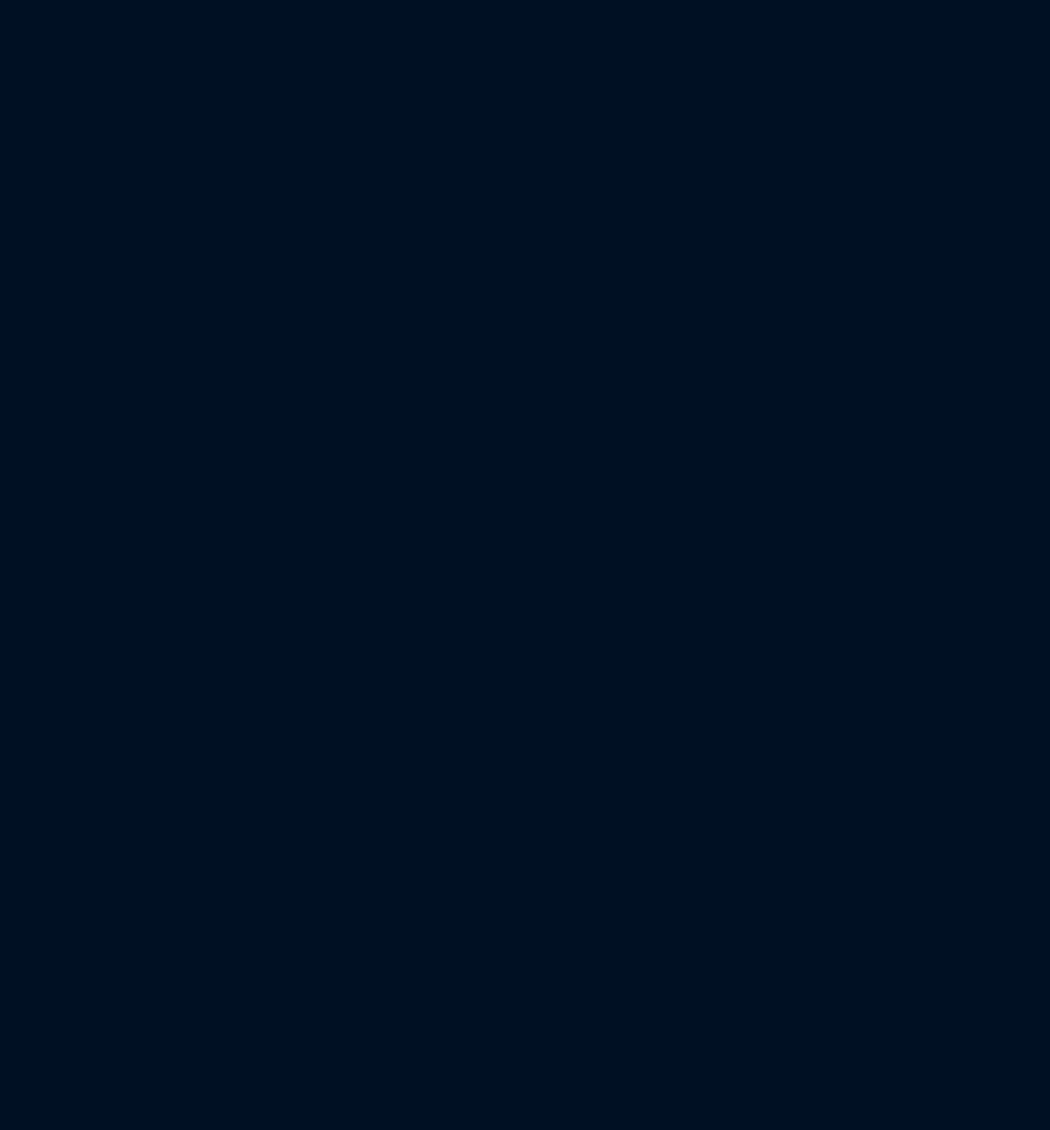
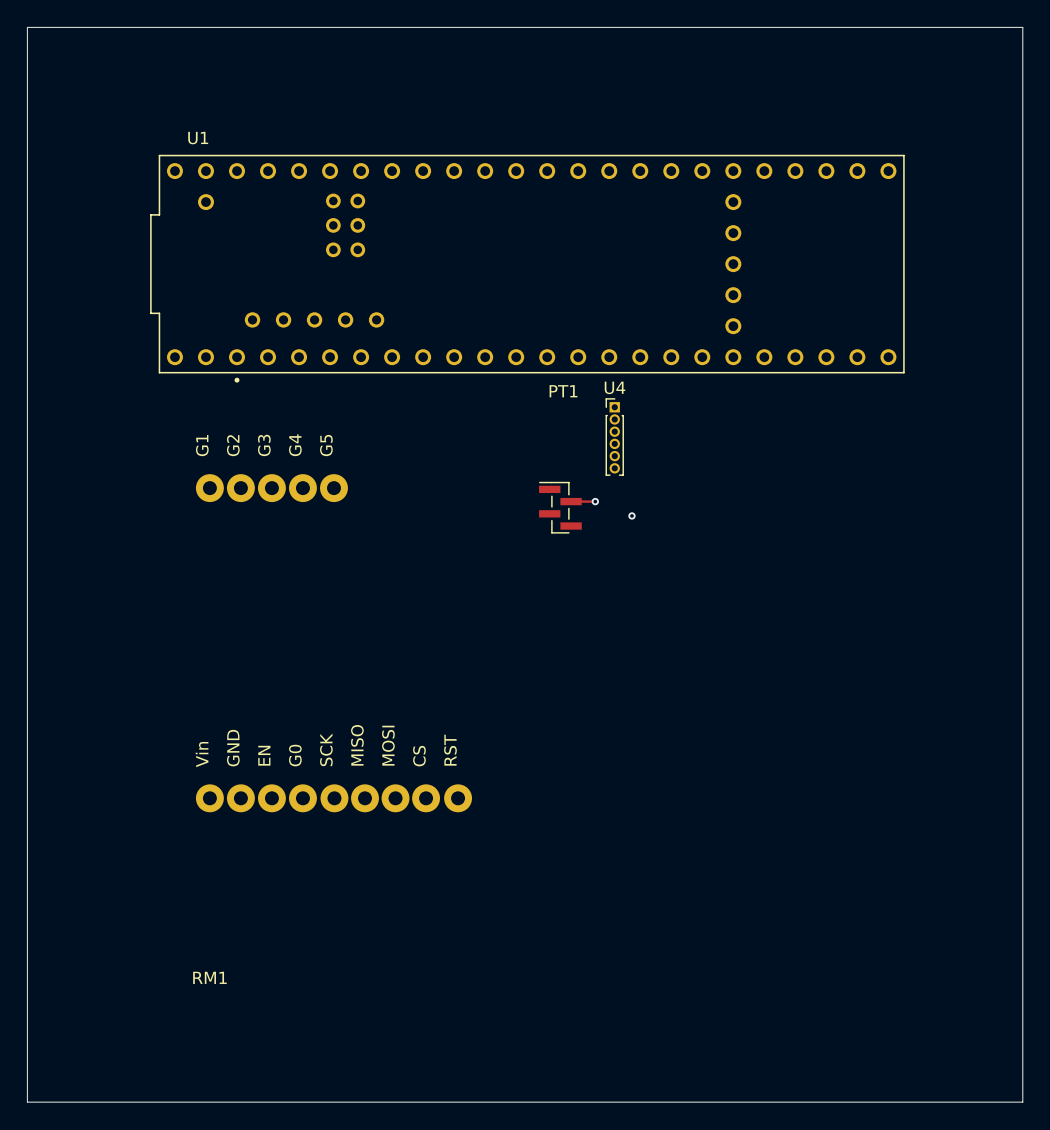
board edge: none -> (27, 27) (1022, 27) (1022, 1102) (27, 1102) (27, 27)
U1: none -> (527, 268)
U4: none -> (614, 437)
track: none -> (571, 501) (595, 501)
via: none -> (595, 501)
PT1: none -> (560, 507)
via: none -> (631, 515)
RM1: none -> (333, 643)

